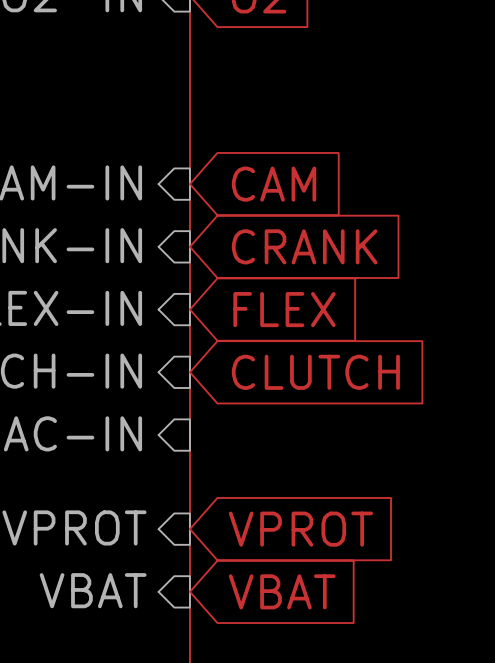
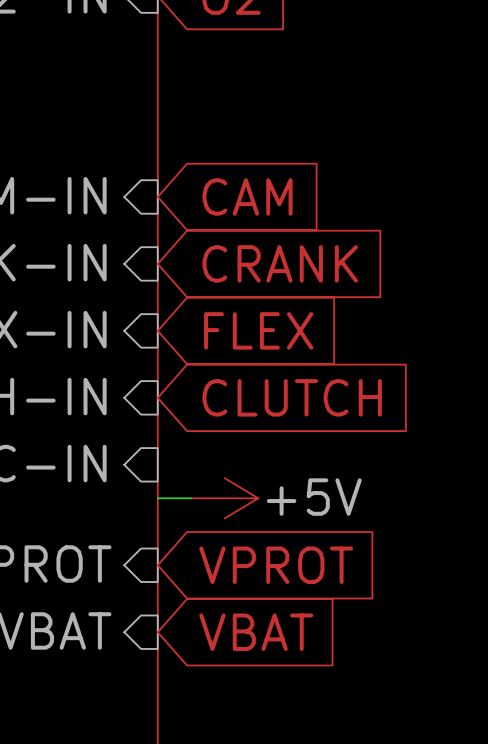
wire: none -> (157, 498) (191, 498)
power symbol: none -> +5V (224, 498)

